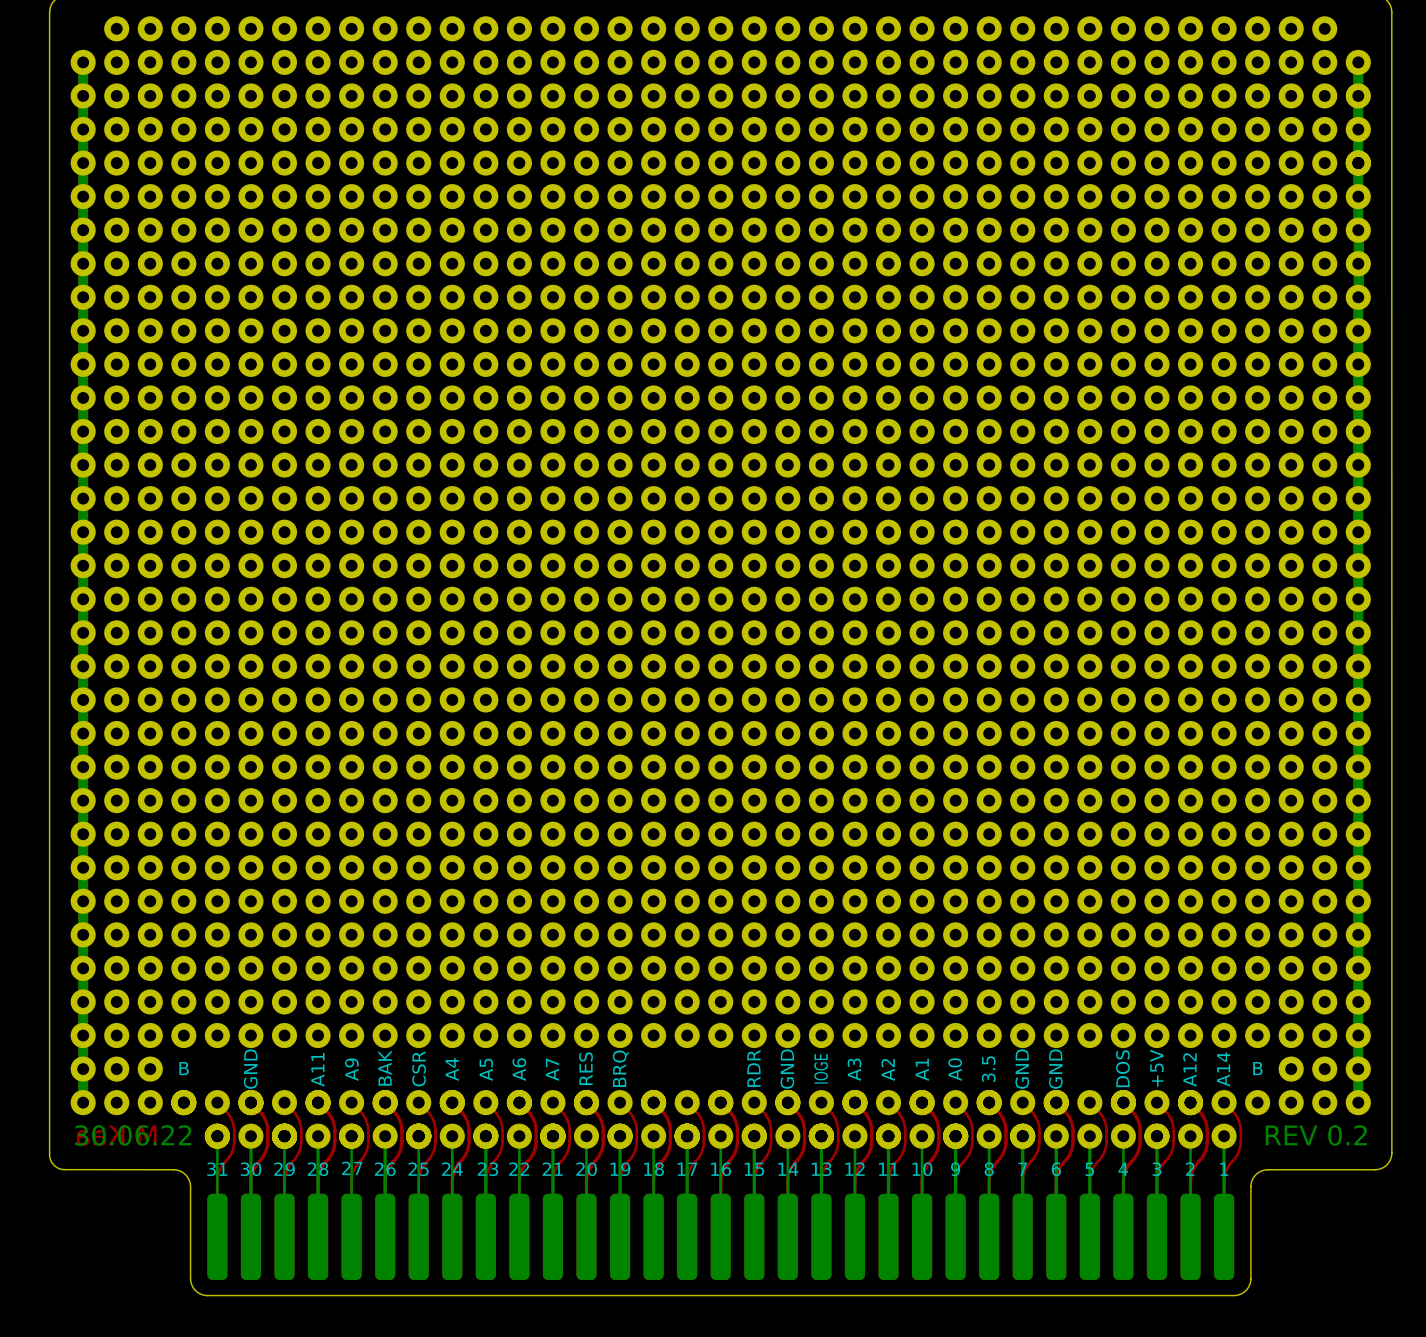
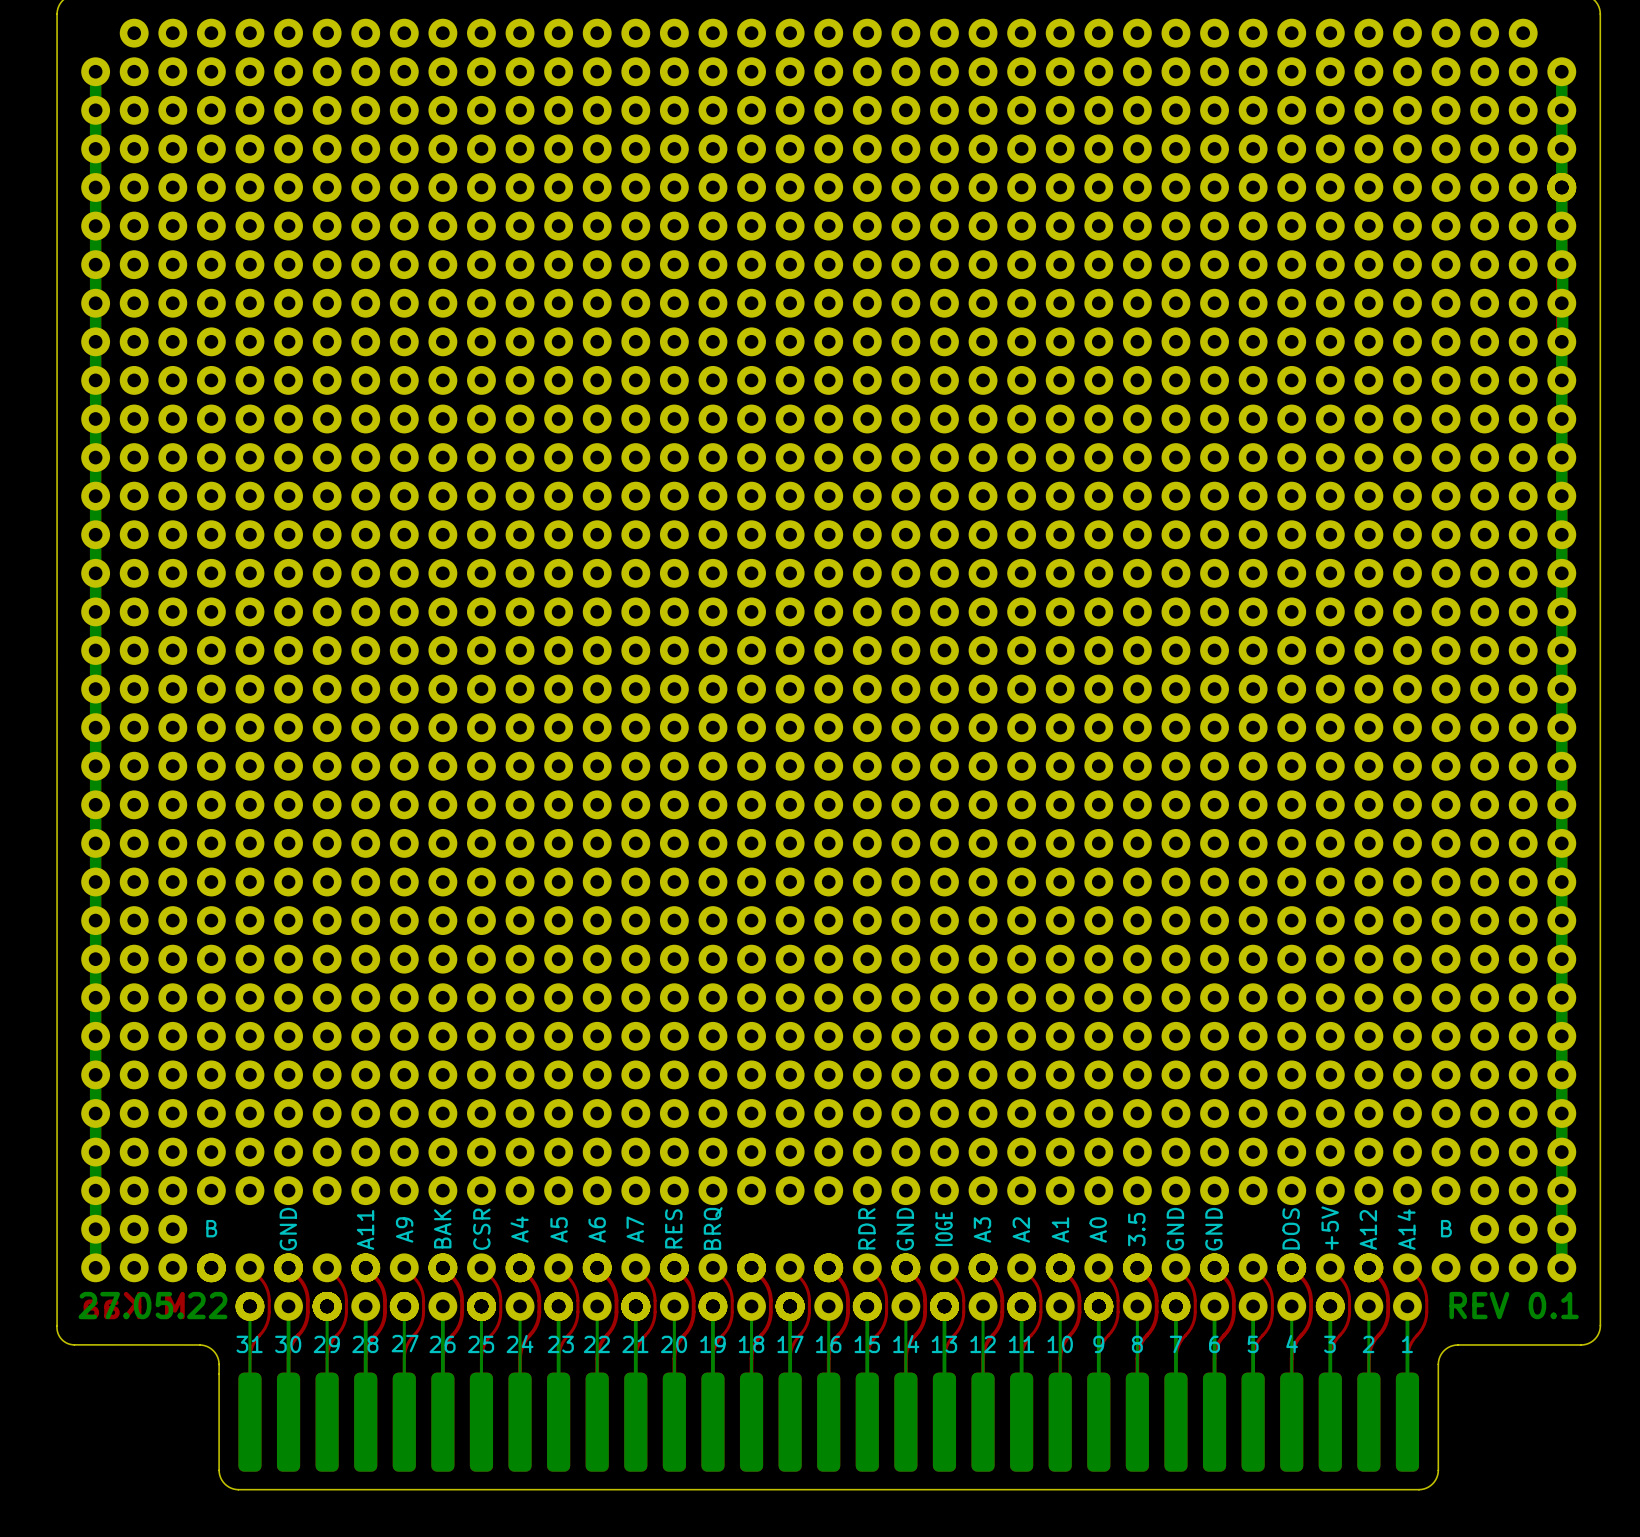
text: 30.06.22 (133, 1135) -> 27.05.22 (152, 1305)
text: REV 0.2 (1316, 1135) -> REV 0.1 (1514, 1305)

